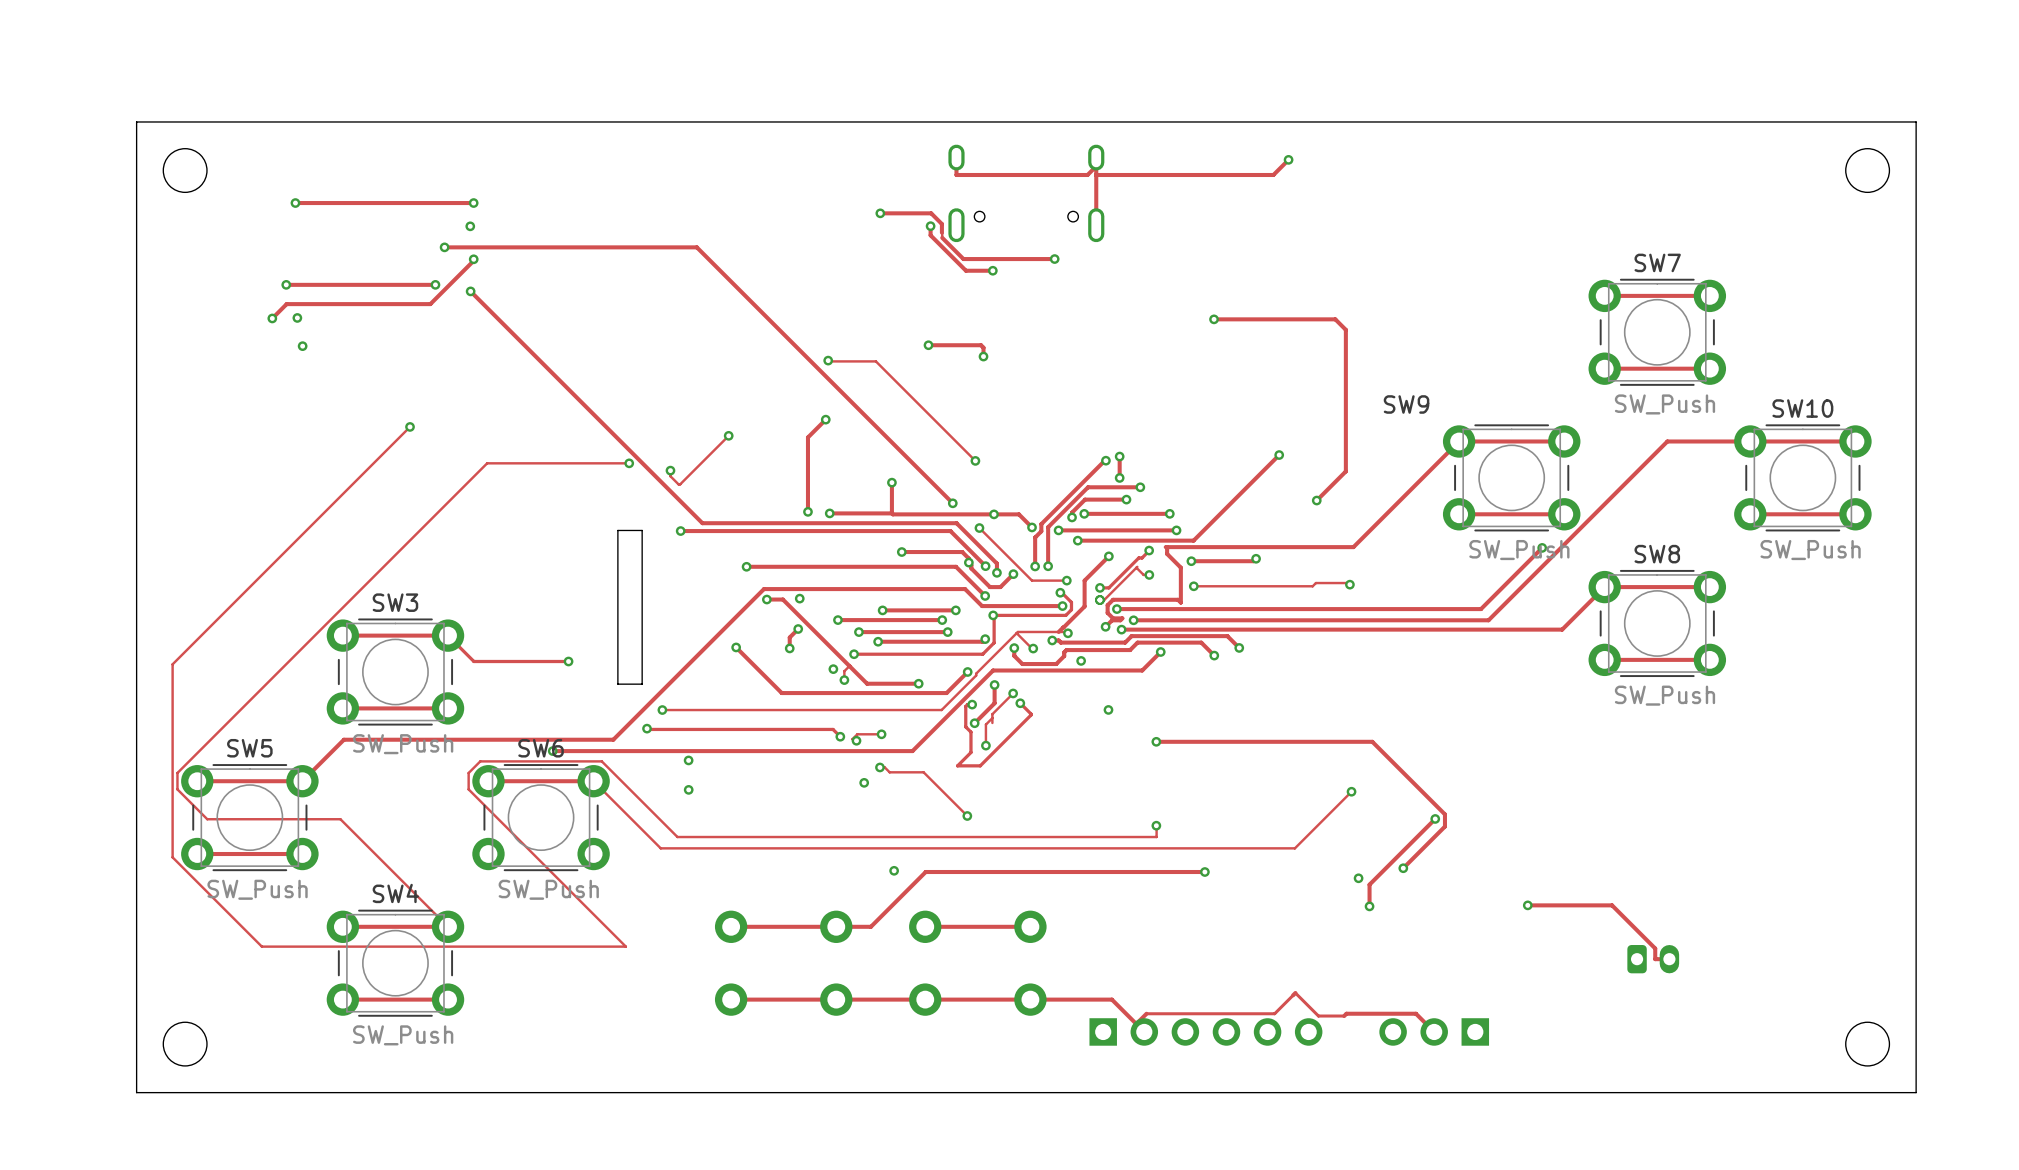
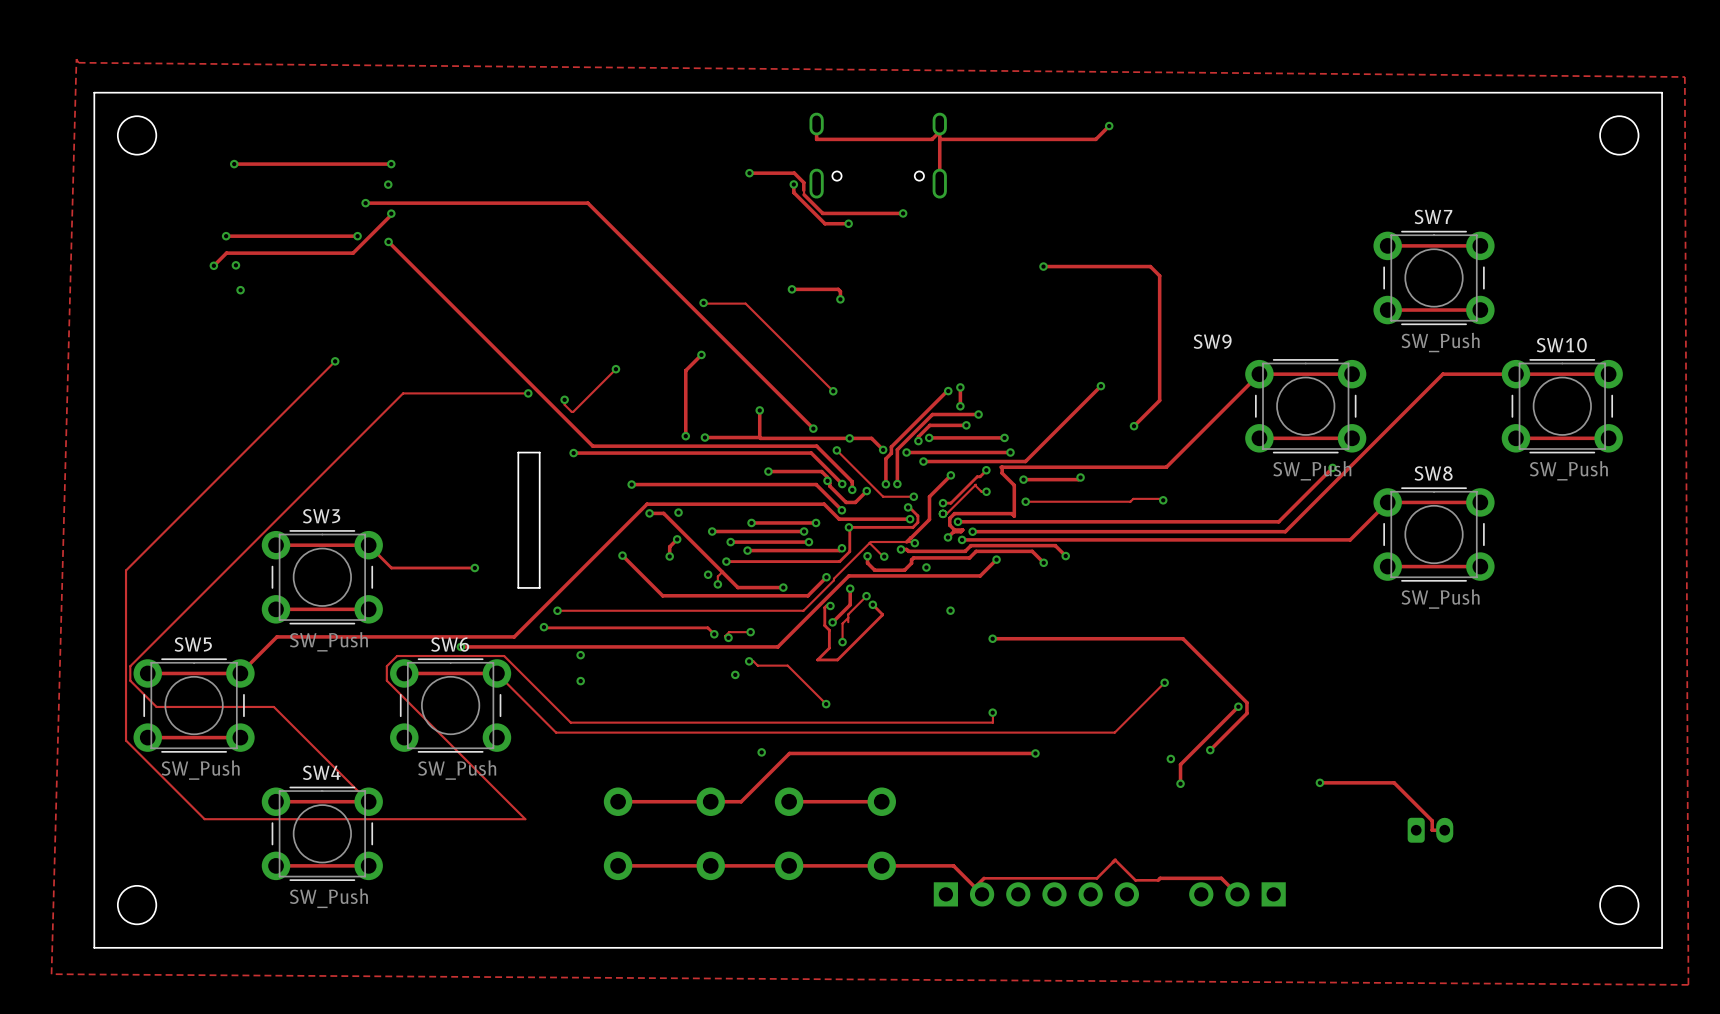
zone outline: none -> (76, 59) (51, 974) (1688, 984) (1684, 77) (78, 62) (76, 59)

